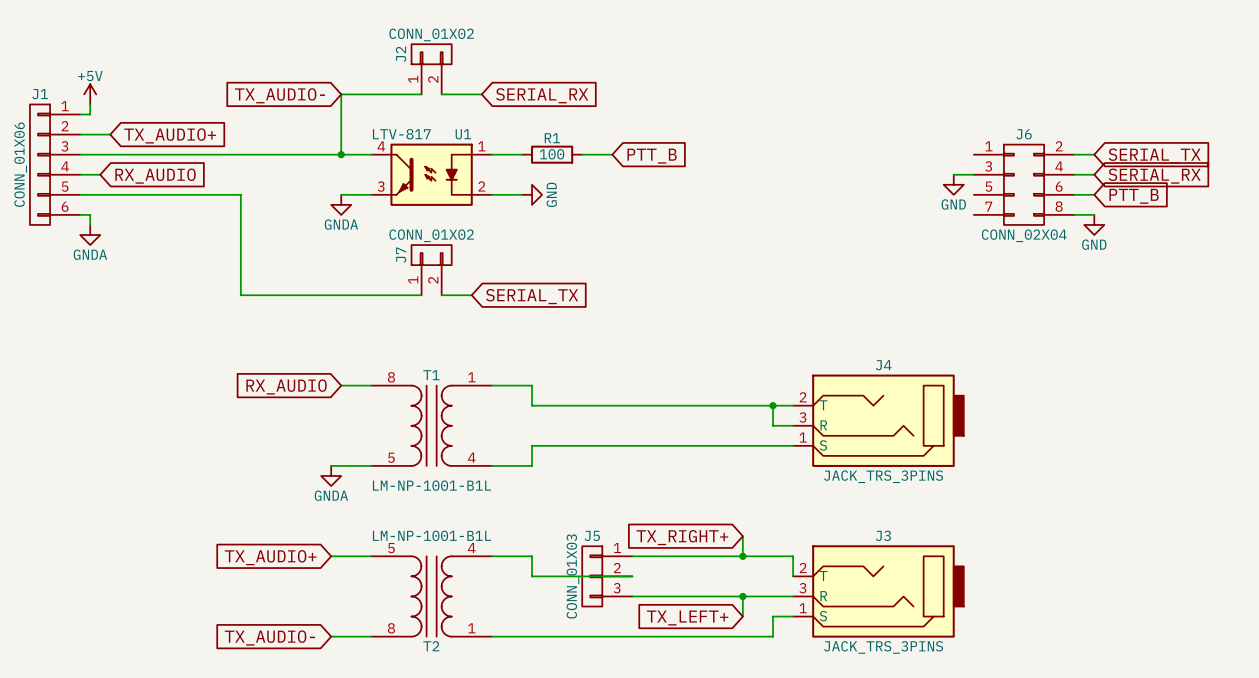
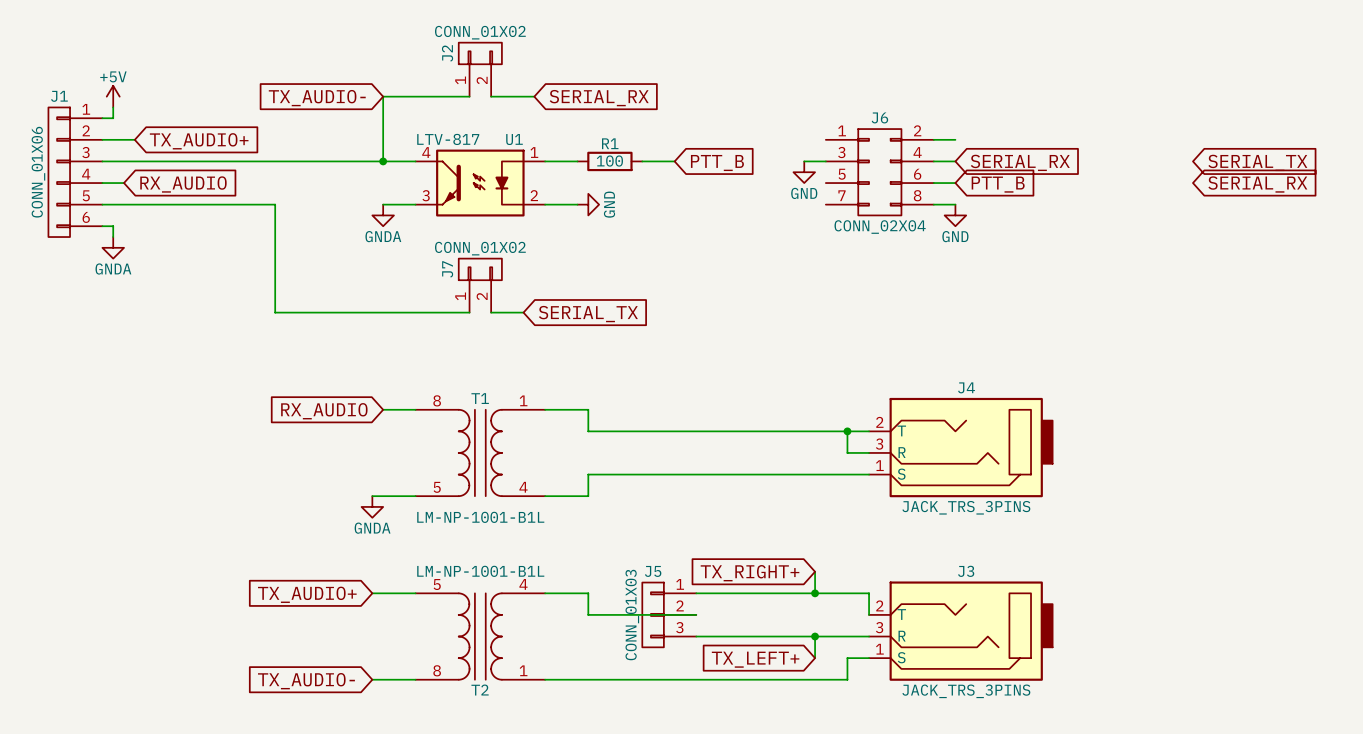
wire: none -> (933, 139) (955, 139)
wire: none -> (804, 161) (825, 161)
wire: none -> (933, 161) (955, 161)
wire: (1074, 154) (1094, 154) -> none
global label: none -> SERIAL_RX (1020, 162)
power symbol: none -> GND (804, 172)
wire: (953, 174) (973, 174) -> (933, 183) (955, 183)
wire: (1074, 174) (1094, 174) -> none
global label: none -> PTT_B (998, 184)
power symbol position: GND (953, 184) -> GND (955, 215)
J6 position: (1024, 184) -> (879, 172)
wire: none -> (933, 204) (955, 204)
wire: (1074, 194) (1094, 194) -> none
global label: PTT_B (1134, 196) -> none
wire: (1074, 214) (1094, 214) -> none
power symbol: GND (1094, 224) -> none

